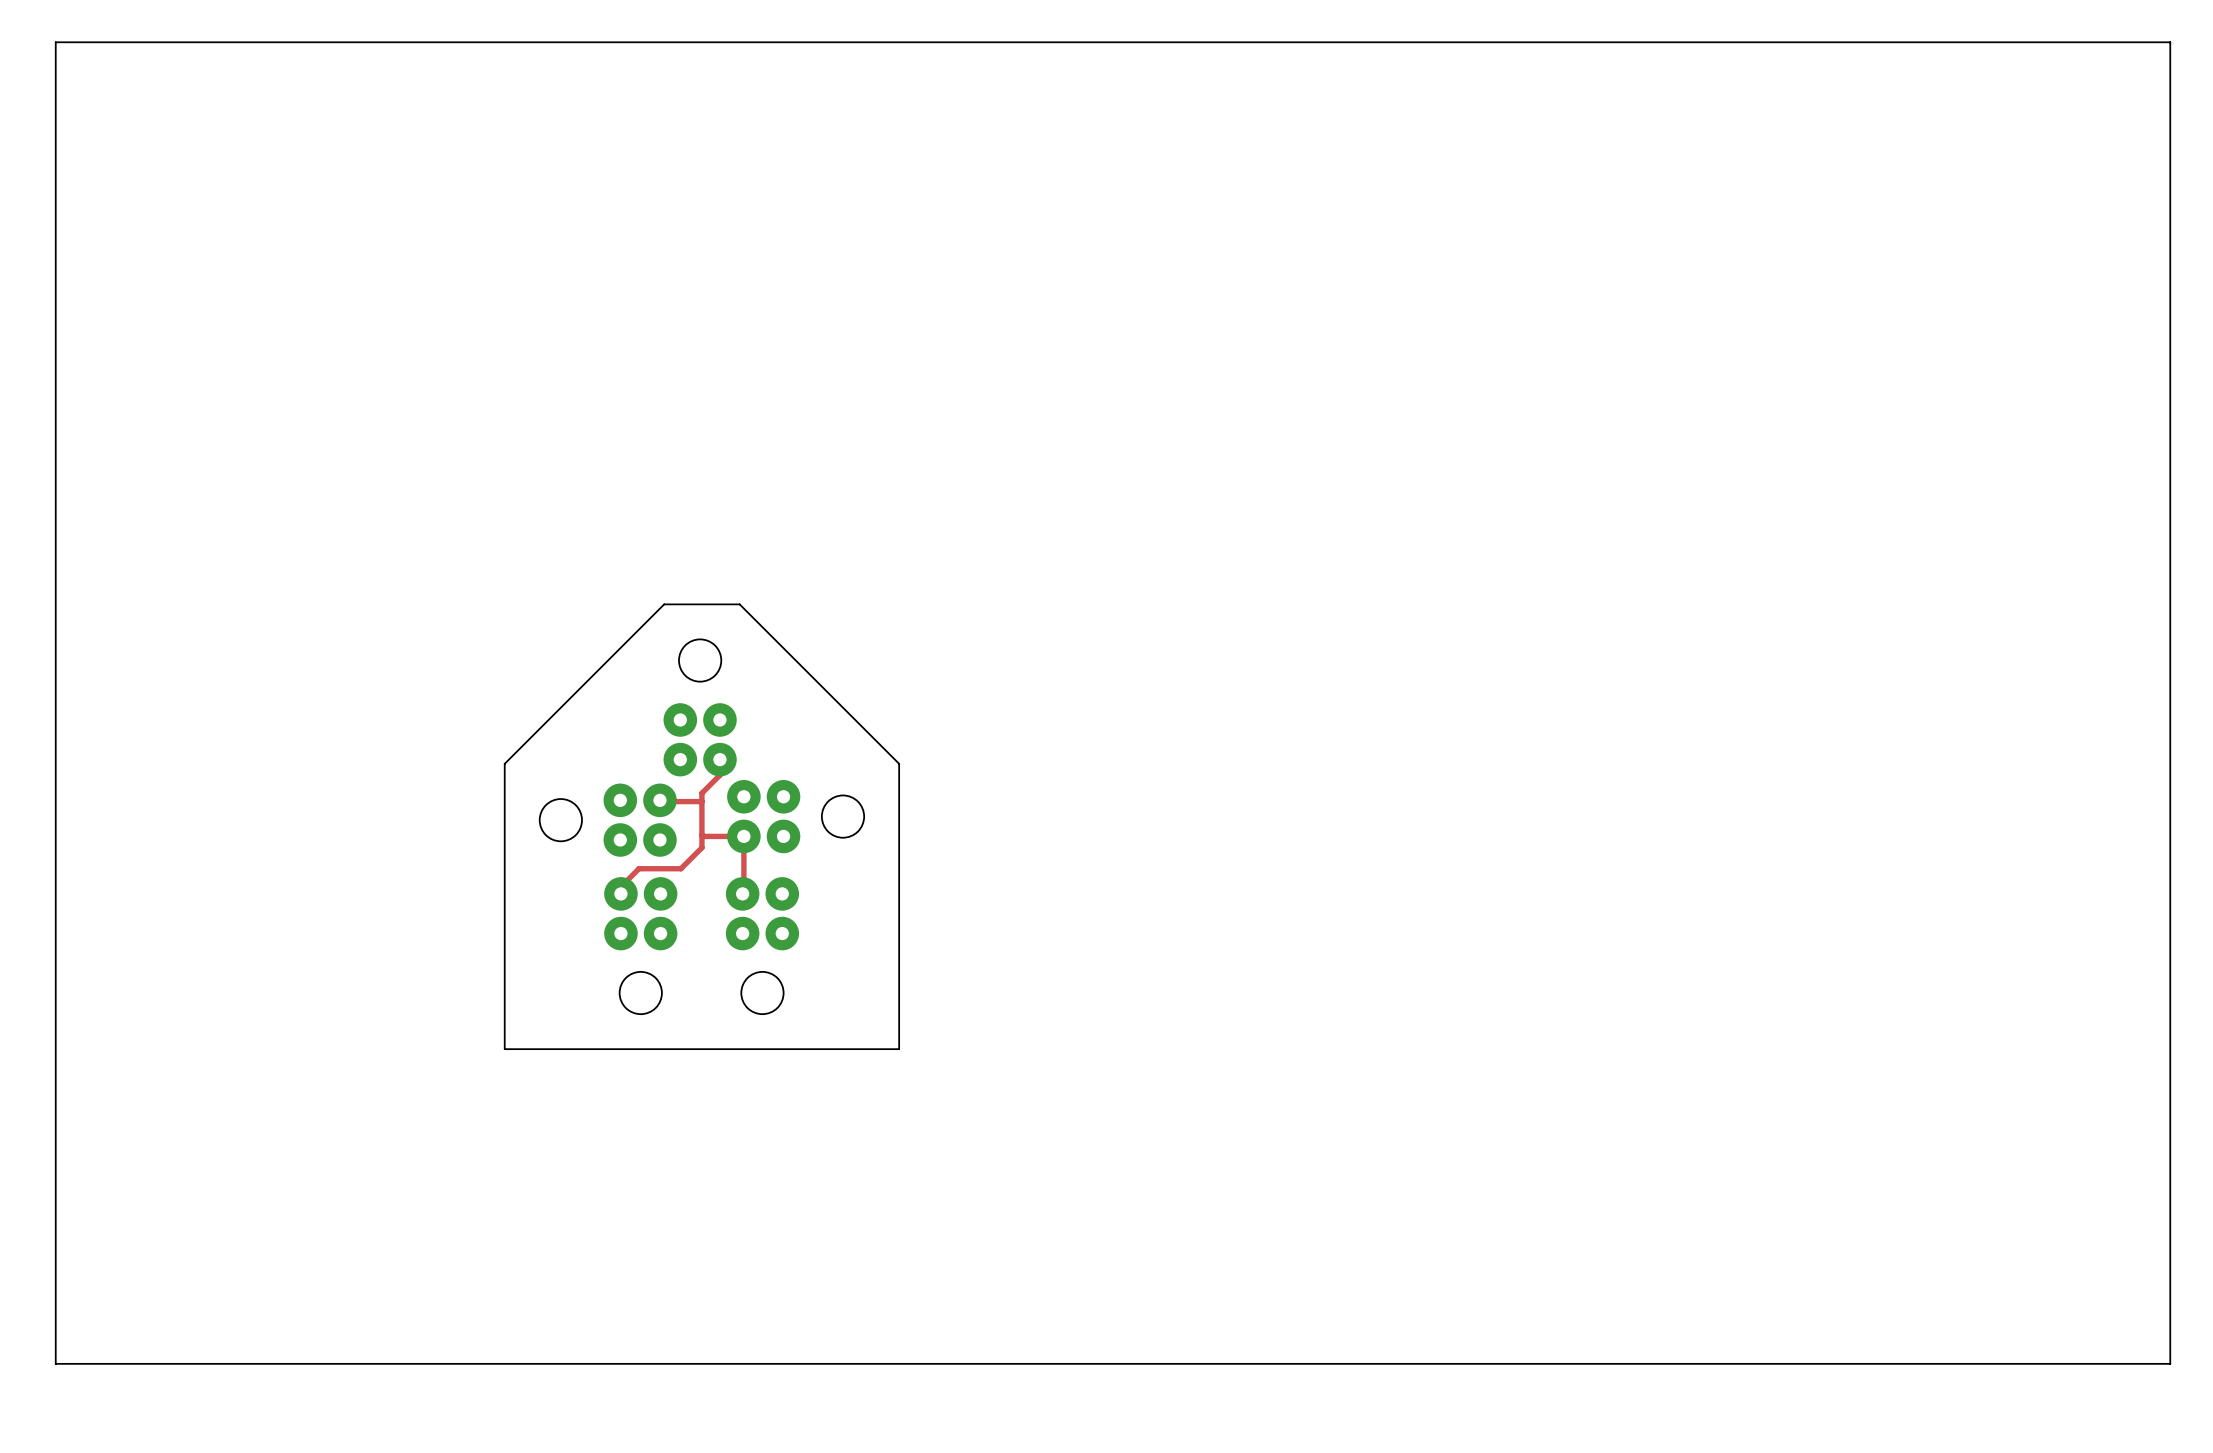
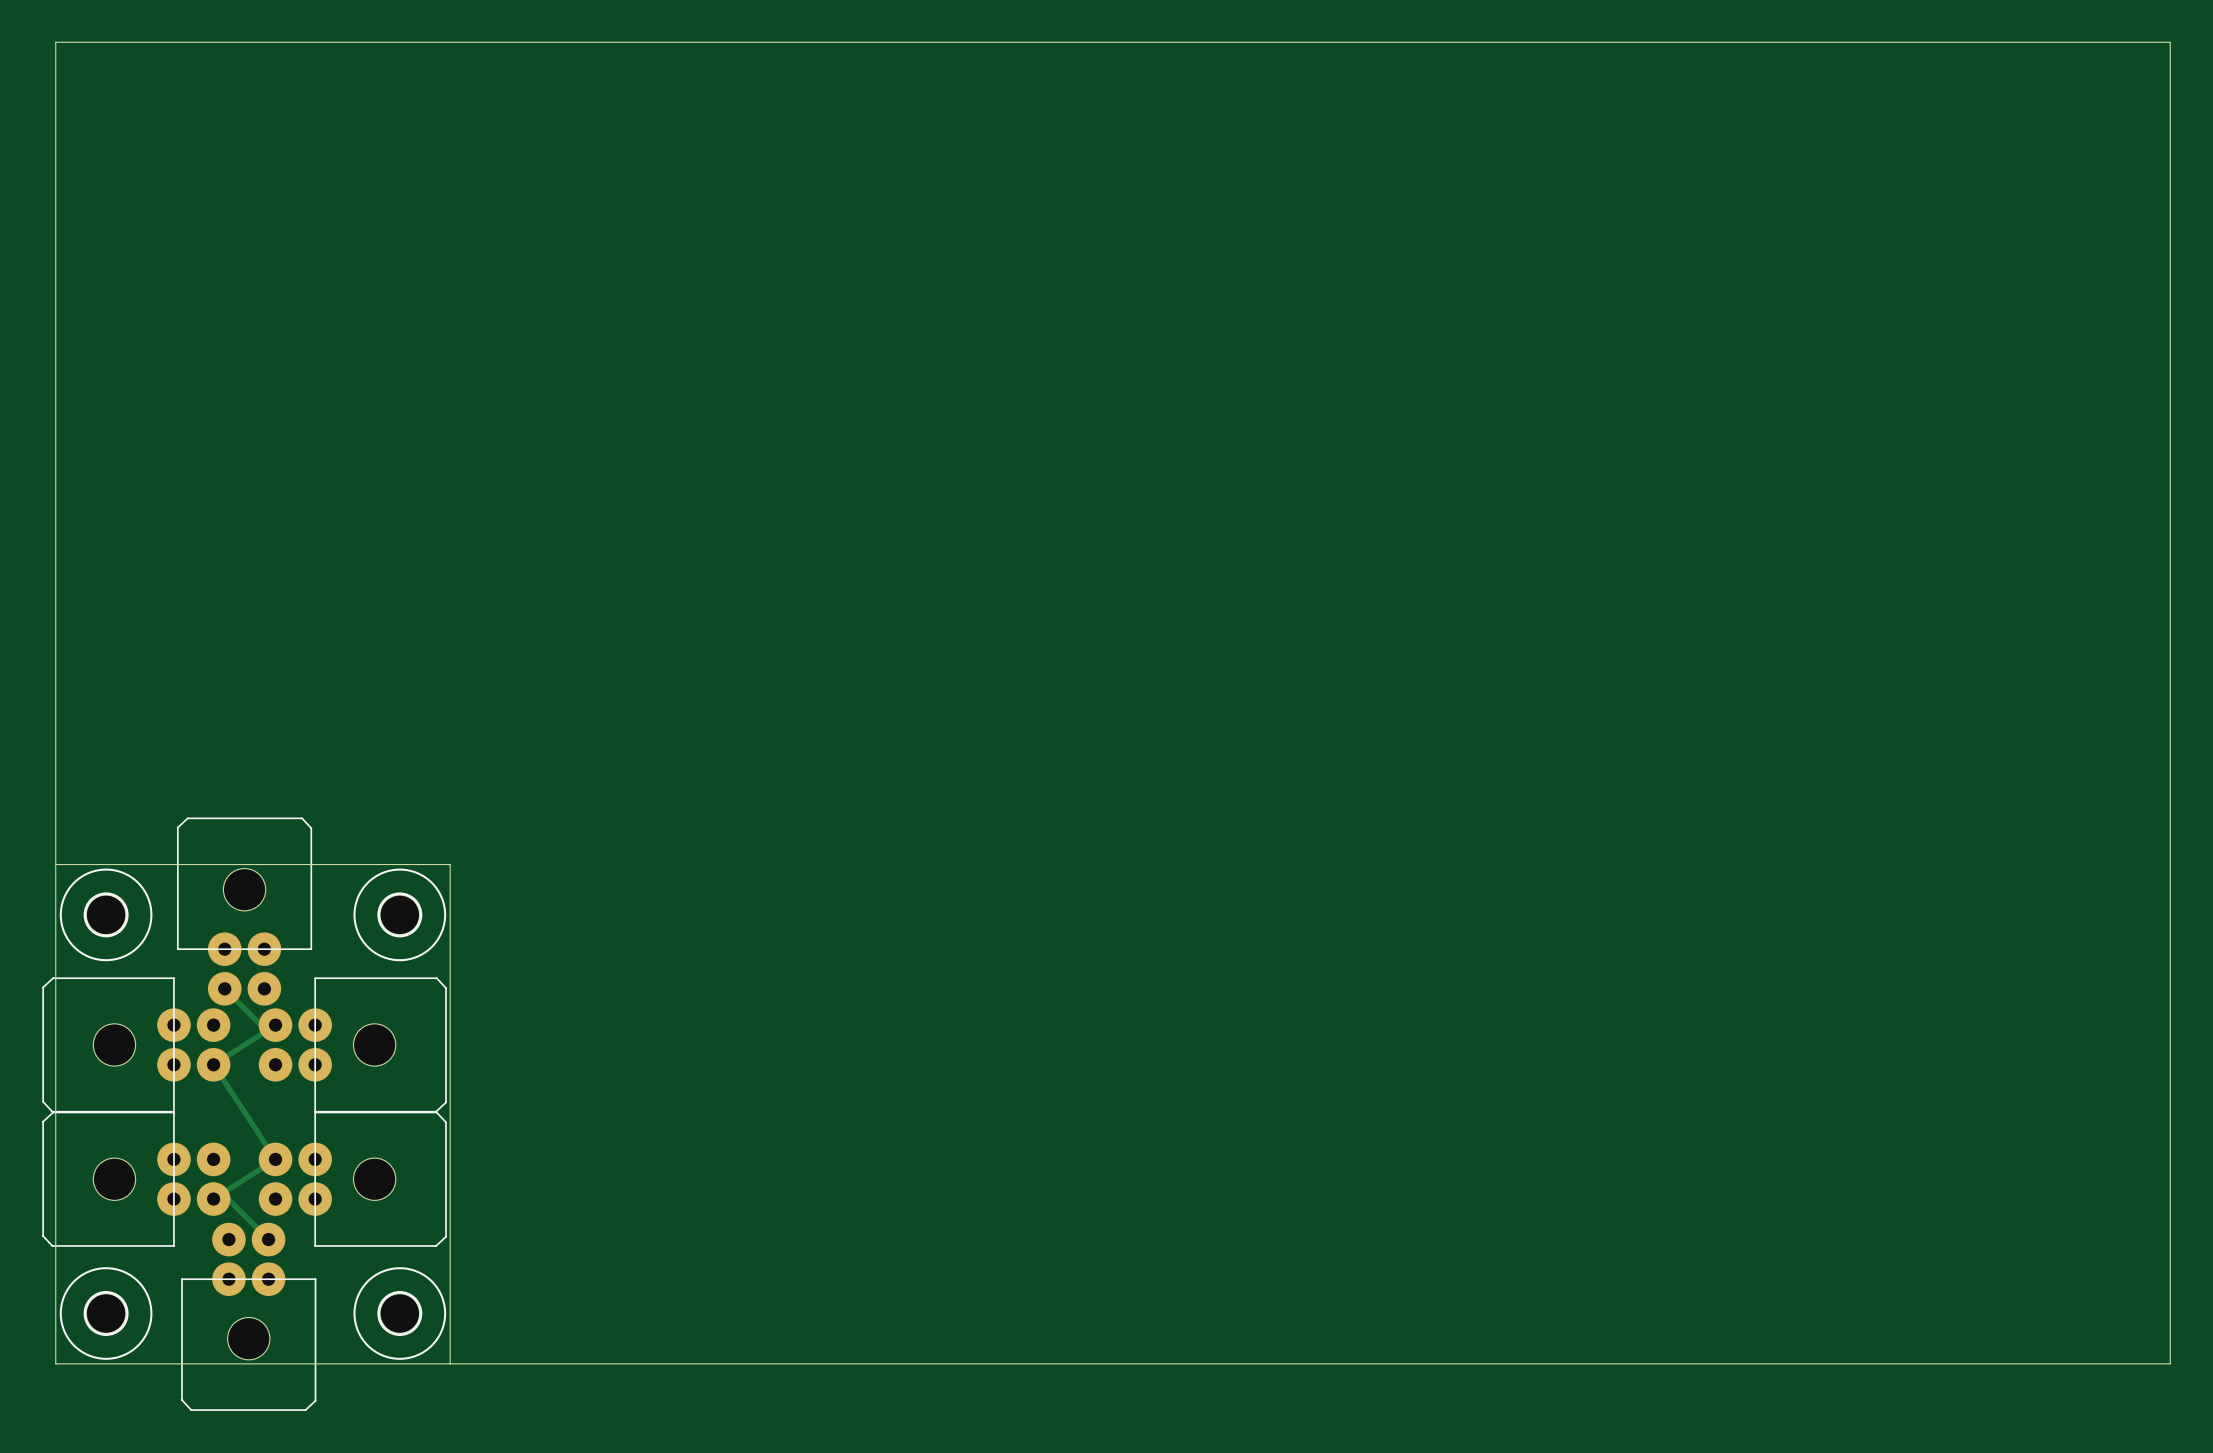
board edge: (664, 604) (504, 763) (504, 1049) (899, 1049) (899, 763) (739, 604) (664, 604) -> none
part: (700, 707) -> none
track: (719, 759) (719, 775) (701, 793) (701, 847) (680, 868) (638, 868) (620, 886) (620, 893) -> none
track: (659, 800) (701, 801) -> none
part: (795, 816) -> none
part: (608, 820) -> none
track: (701, 835) (743, 836) (742, 893) -> none
board edge: none -> (55, 864) (450, 864) (450, 1363)
part: none -> (244, 911)
part: none -> (106, 914)
part: none -> (399, 914)
part: (640, 945) -> none
part: (762, 945) -> none
track: none -> (224, 988) (261, 1025) (275, 1025) (213, 1064) (275, 1159) (213, 1199) (228, 1199) (268, 1239)
part: none -> (136, 1044)
part: none -> (352, 1044)
part: none -> (136, 1179)
part: none -> (352, 1179)
part: none -> (106, 1313)
part: none -> (399, 1313)
part: none -> (248, 1316)

